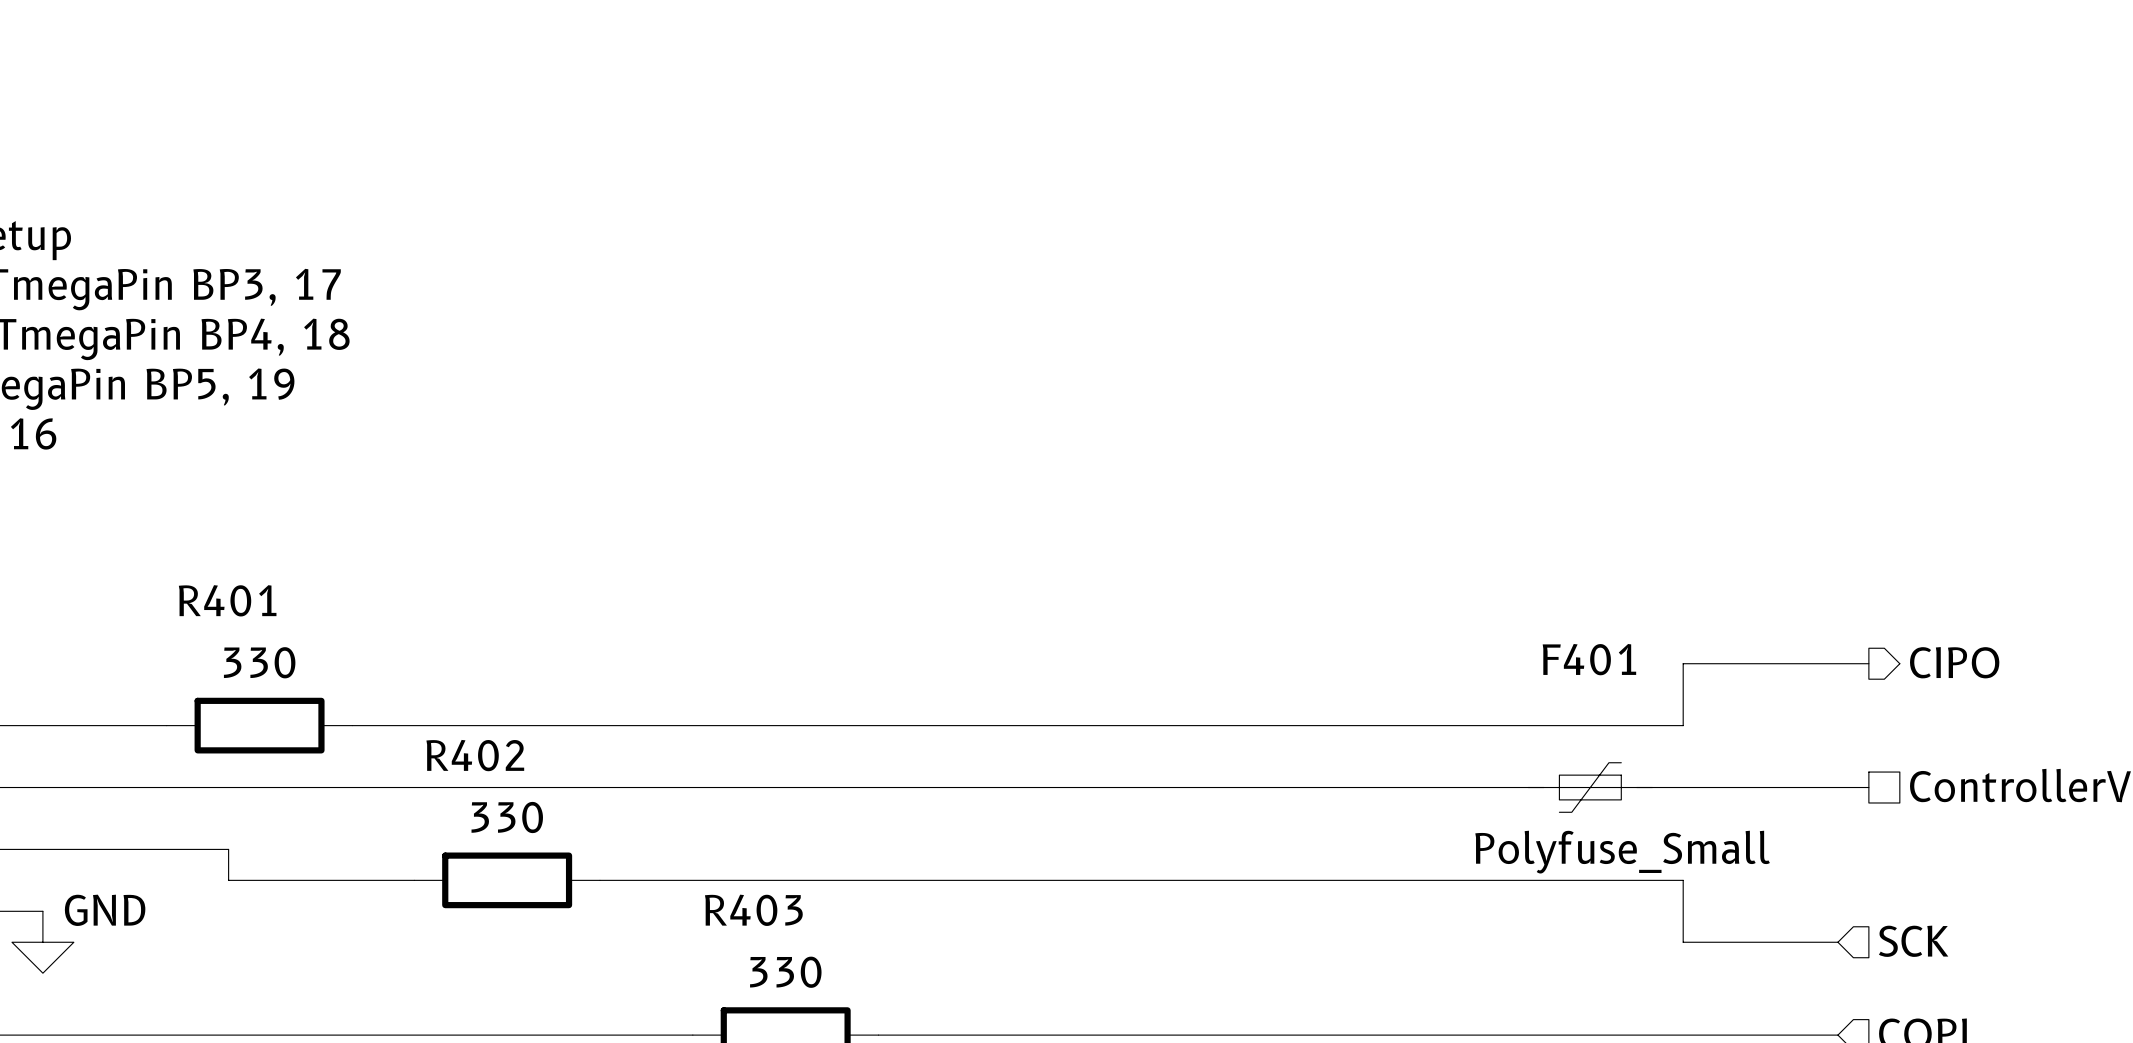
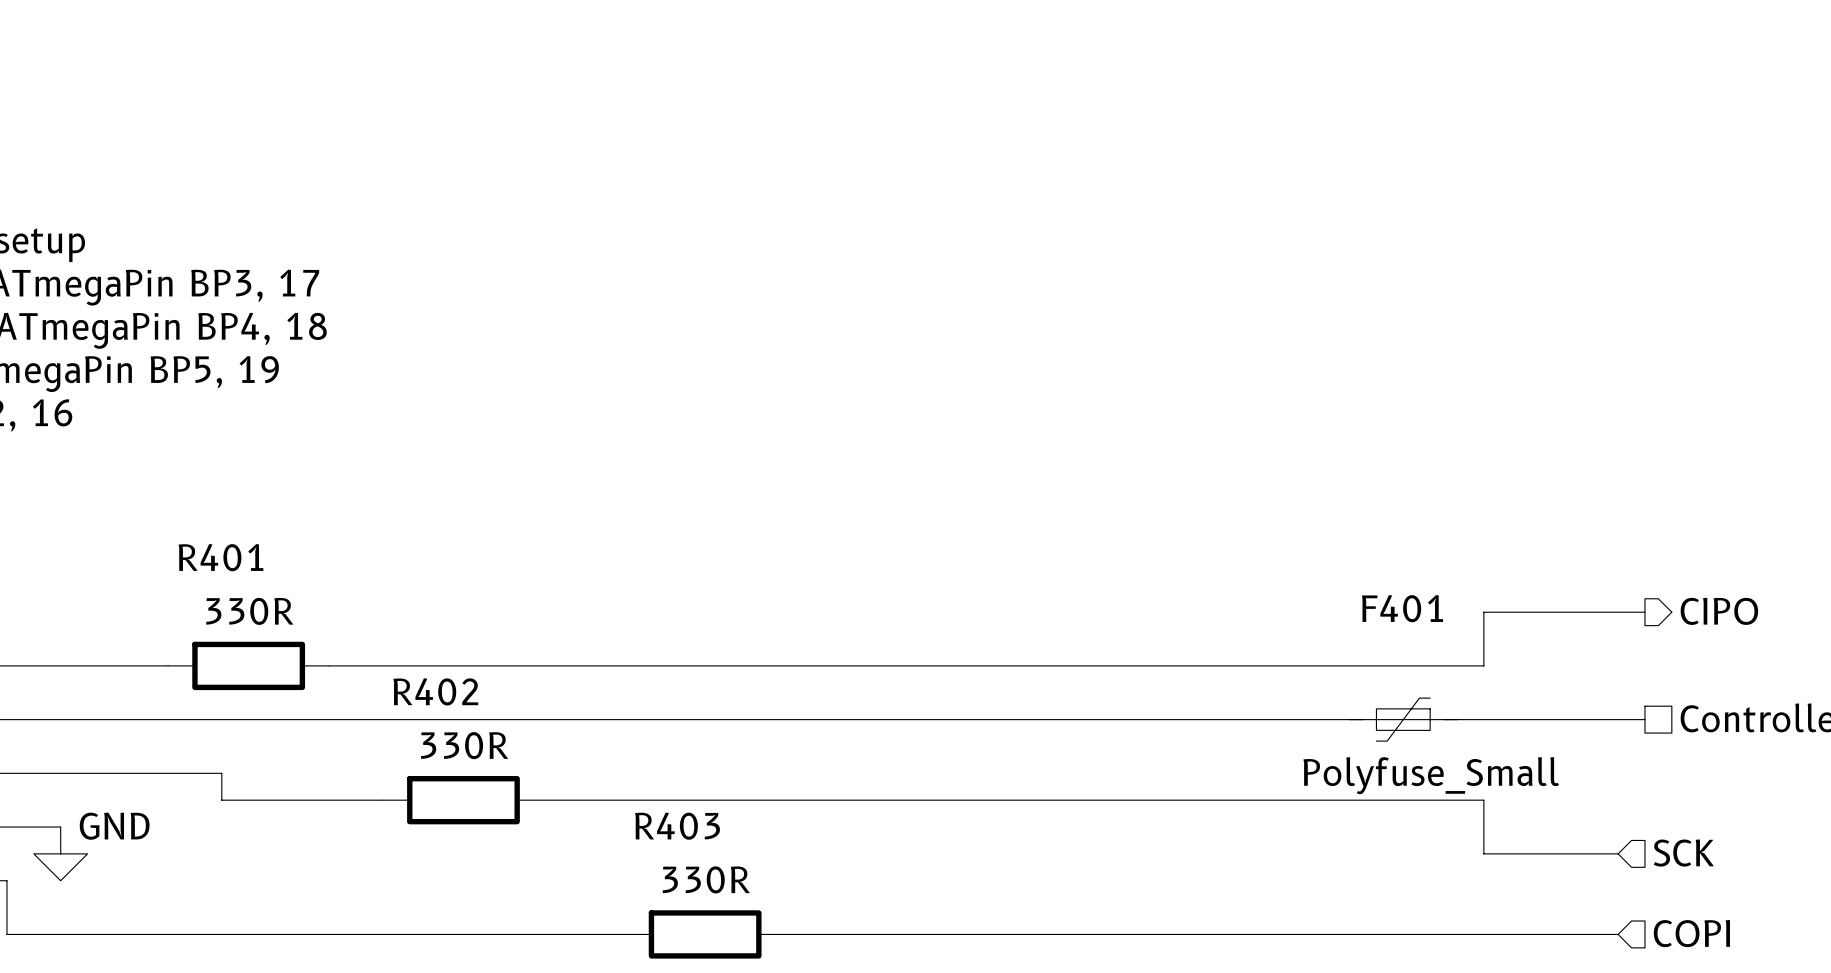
R401 value: 330 (259, 662) -> 330R (249, 611)
R402 value: 330 (507, 817) -> 330R (464, 745)
R403 value: 330 (785, 972) -> 330R (706, 879)

